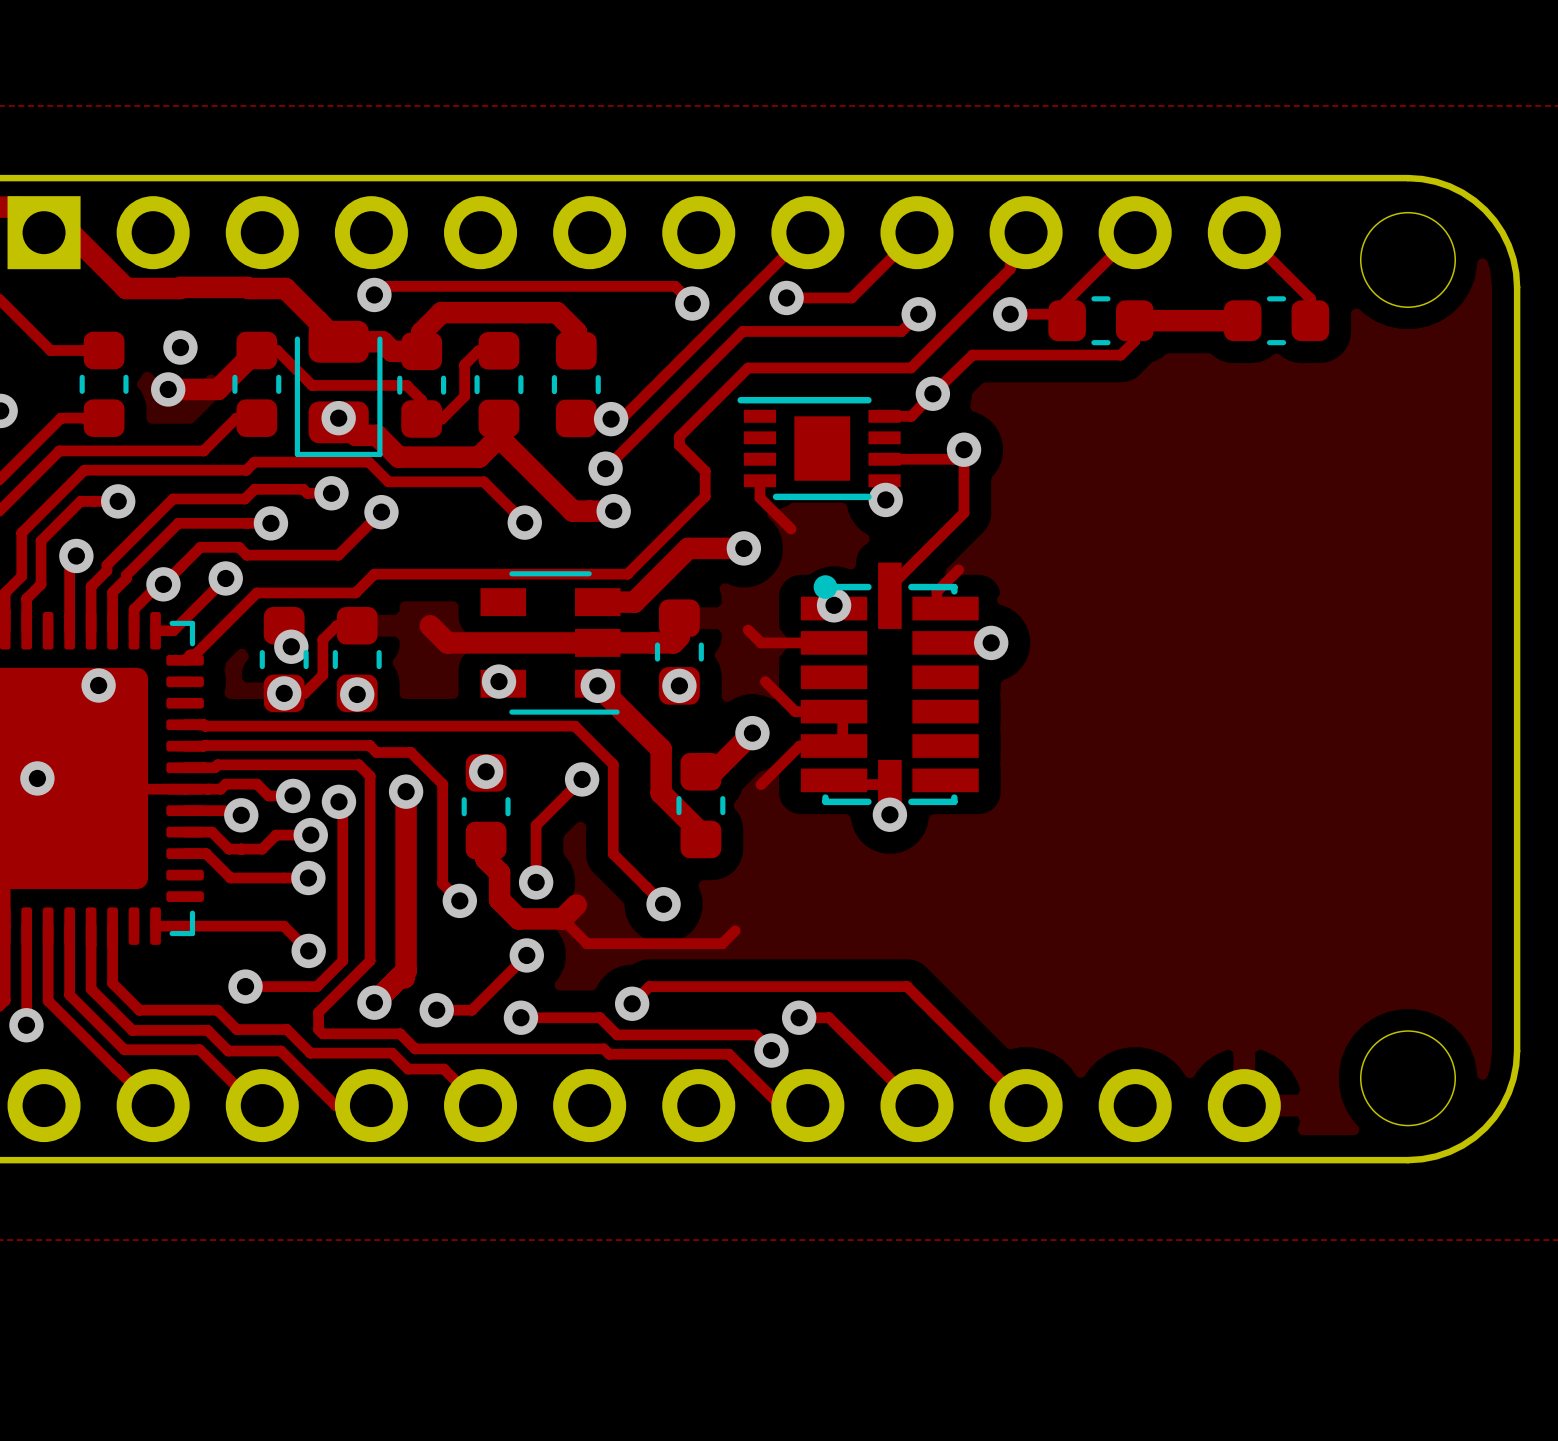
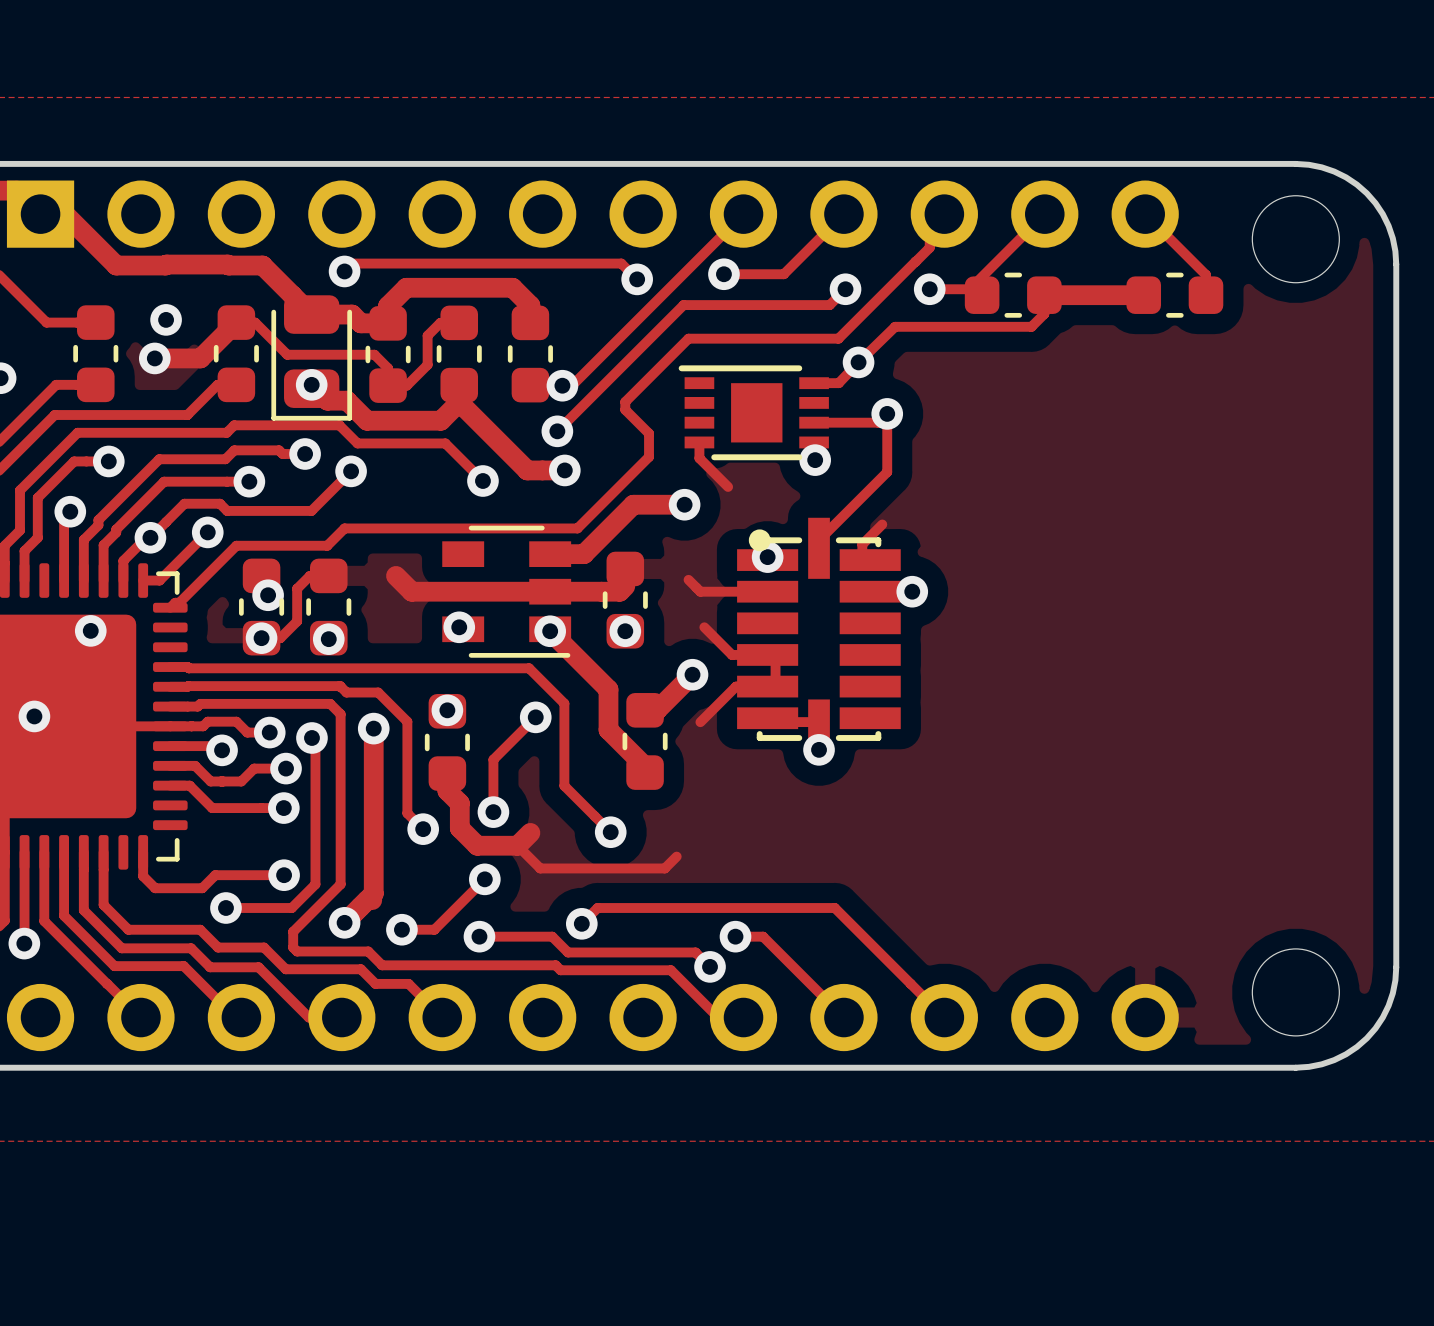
track: (155, 926) (283, 926) (308, 950) -> (143, 852) (143, 876) (155, 888) (202, 888) (215, 875) (284, 875)

